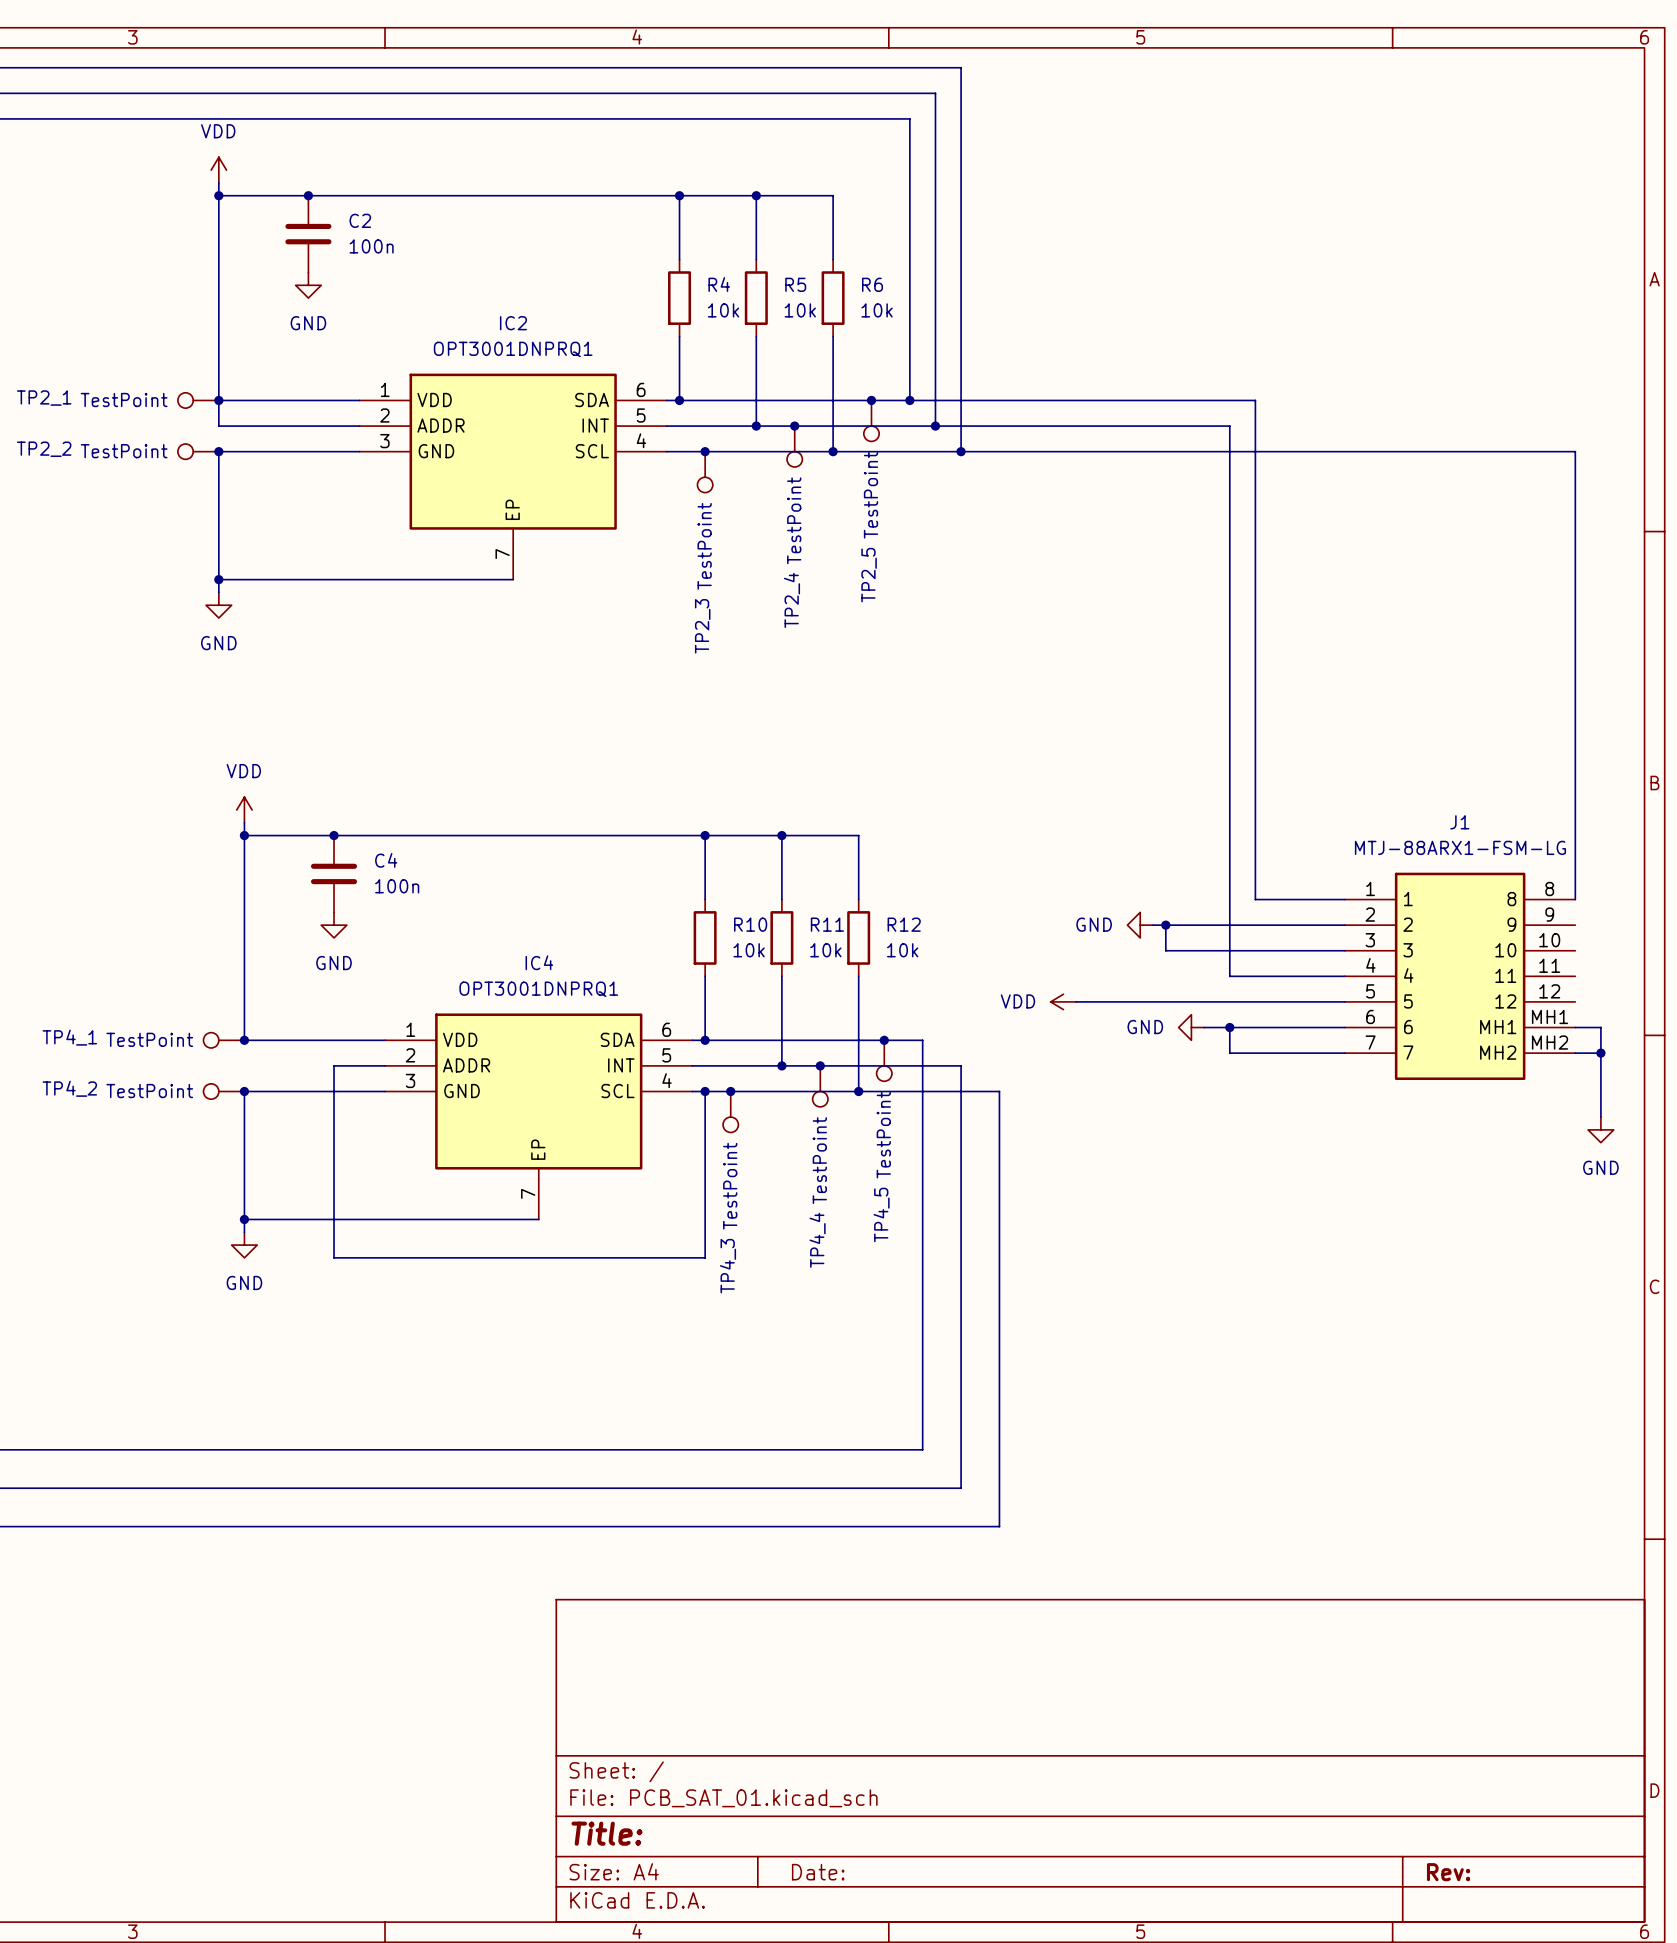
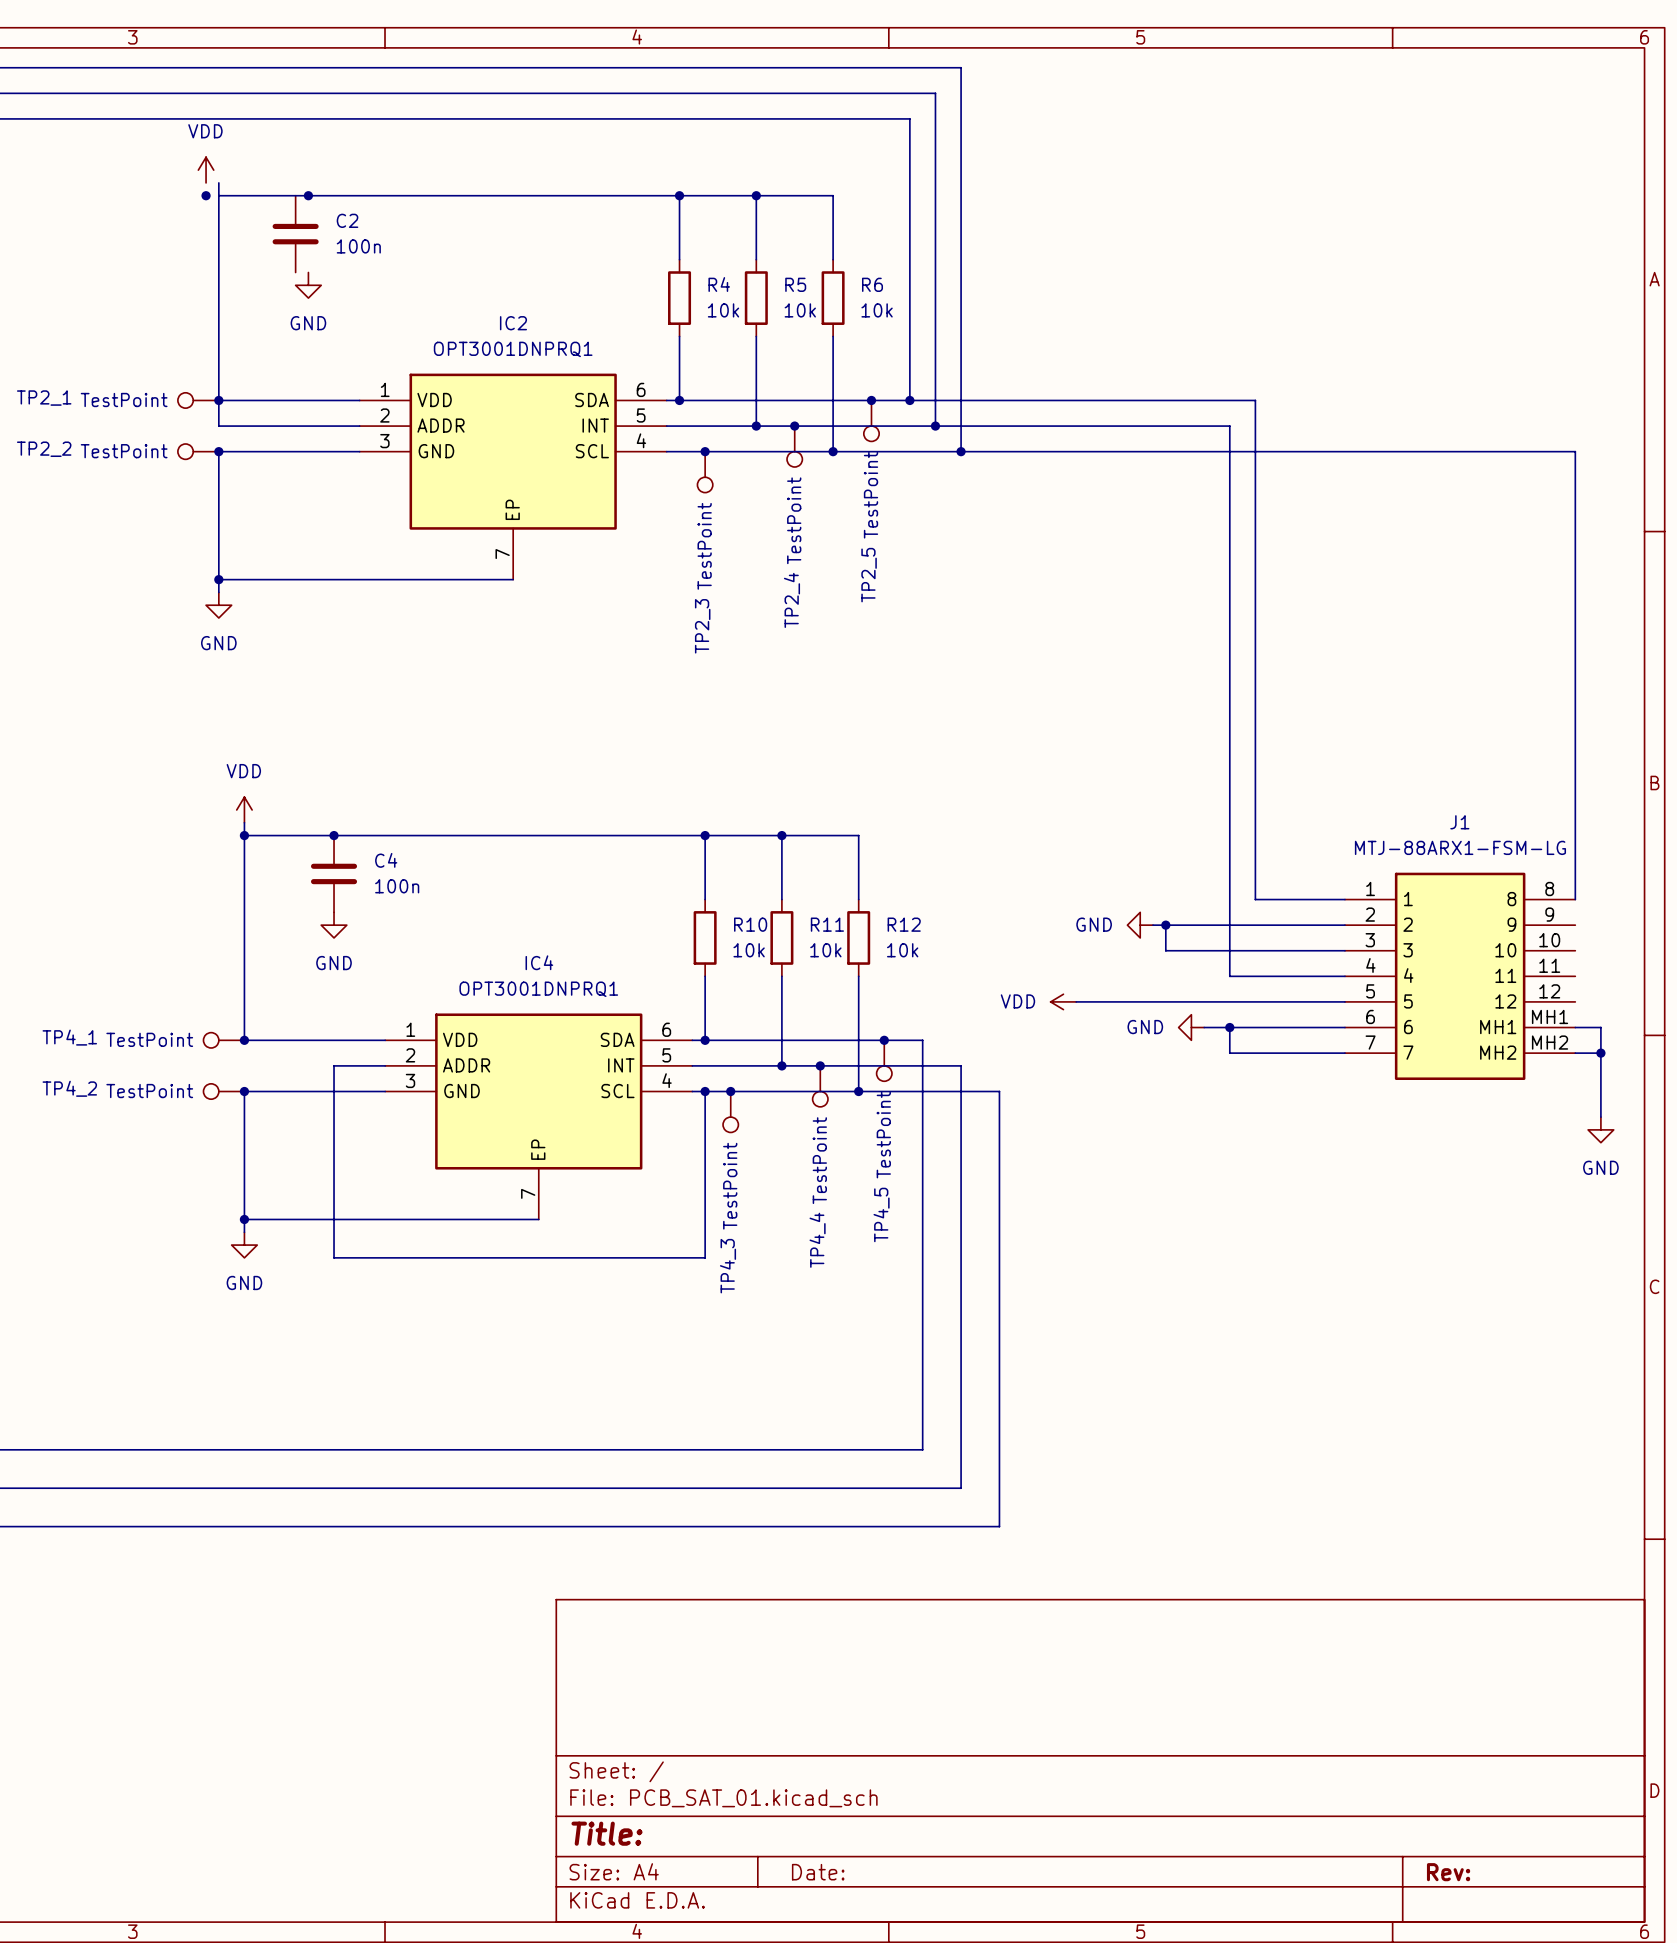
power symbol position: VDD (218, 170) -> VDD (206, 170)
junction position: (218, 195) -> (206, 195)
C2 position: (308, 234) -> (295, 234)

